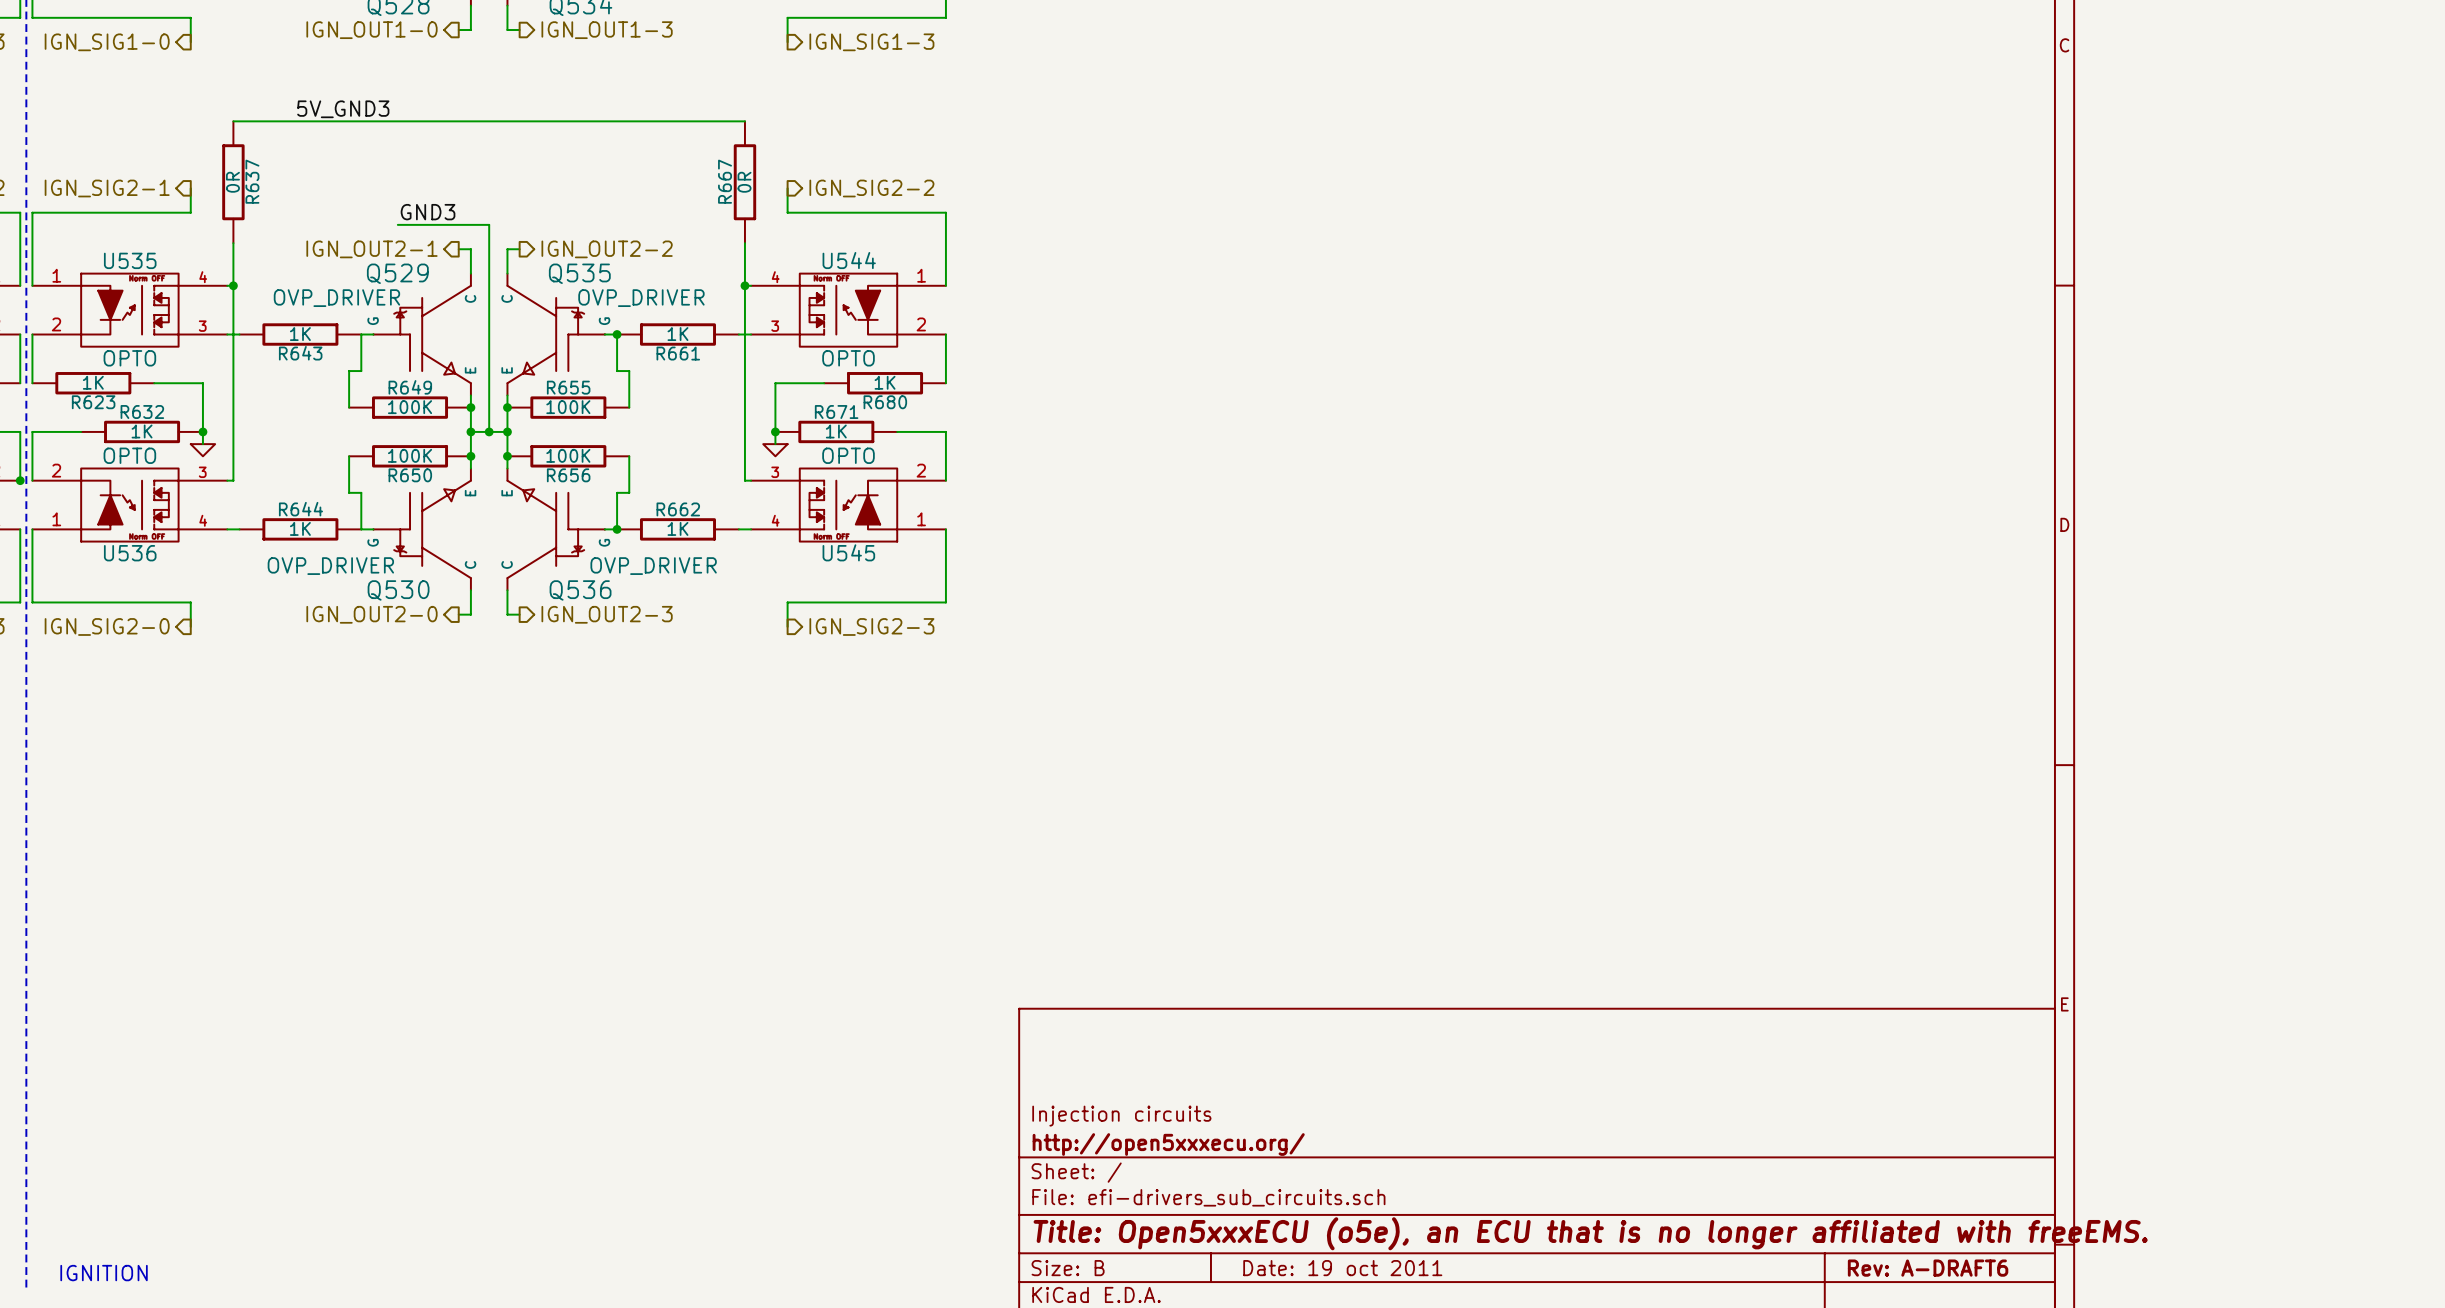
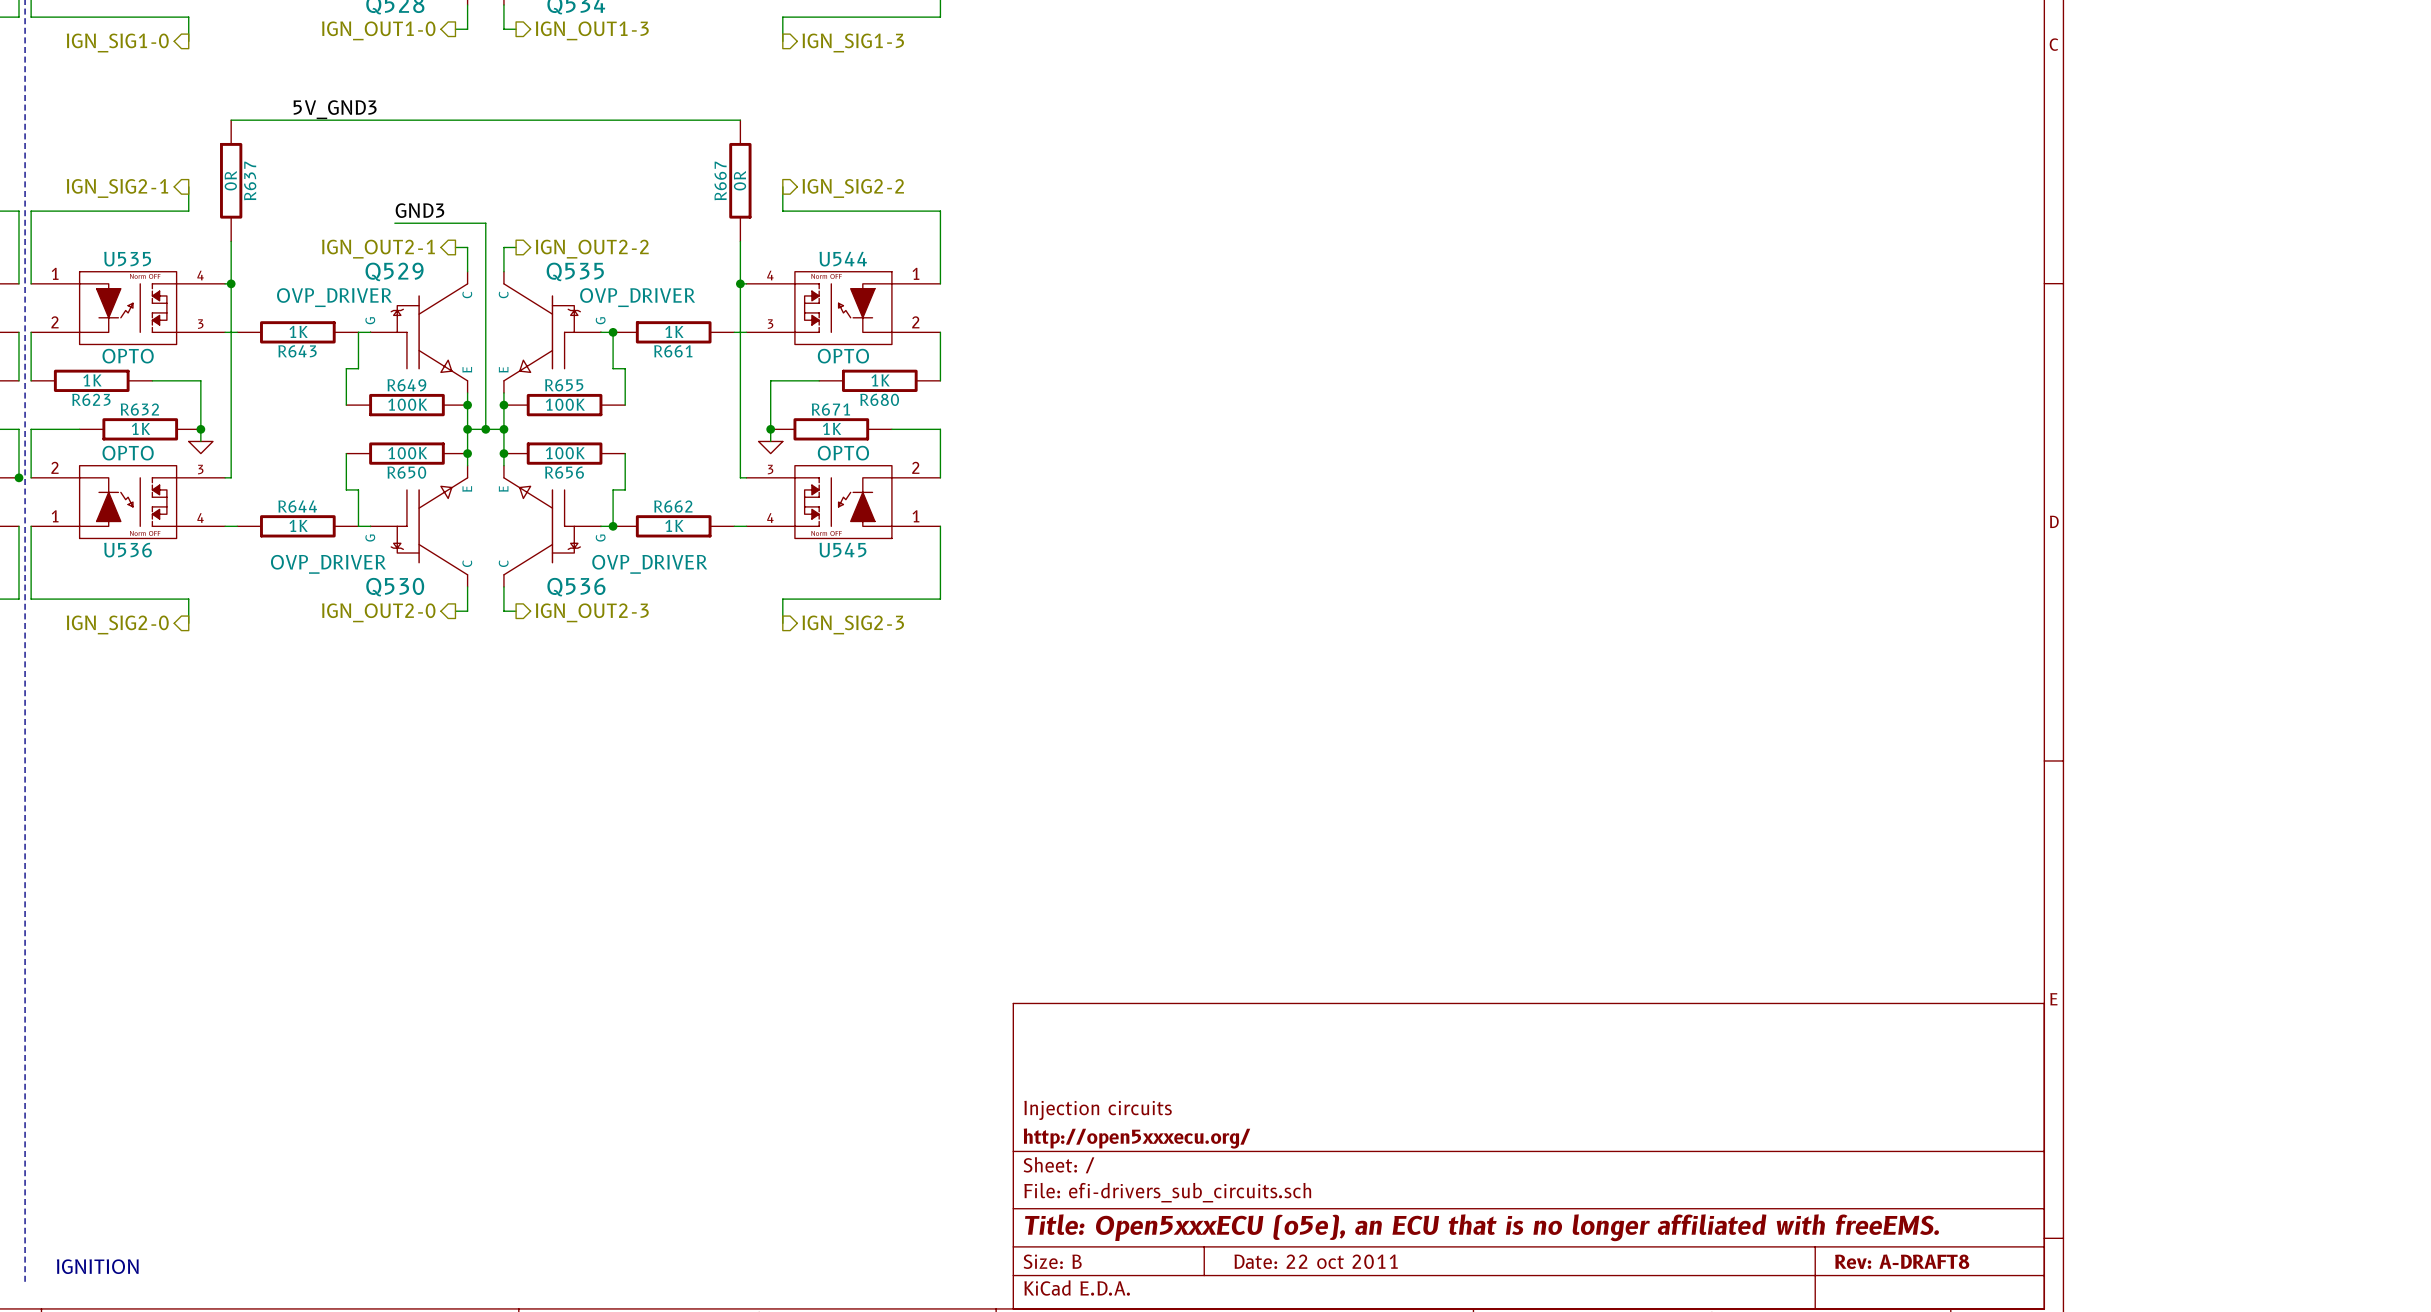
title block: Date: 19 oct 2011 (1342, 1268) -> Date: 22 oct 2011 (1316, 1261)
title block: Rev: A-DRAFT6 (1928, 1268) -> Rev: A-DRAFT8 (1902, 1261)

